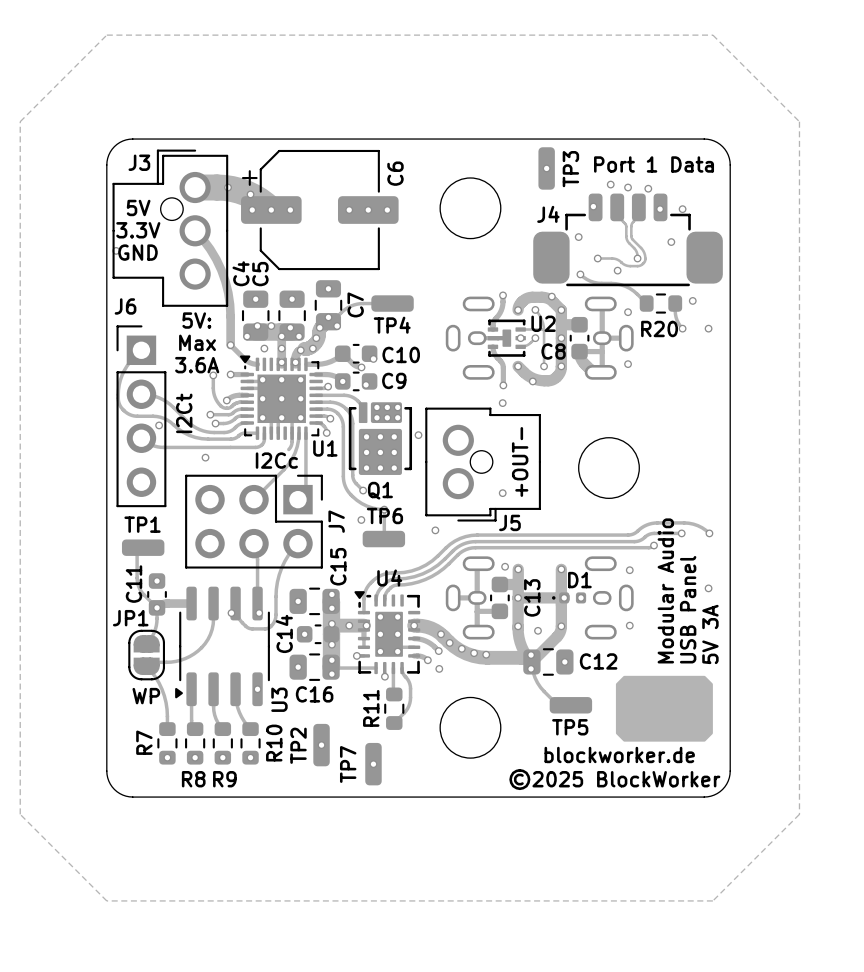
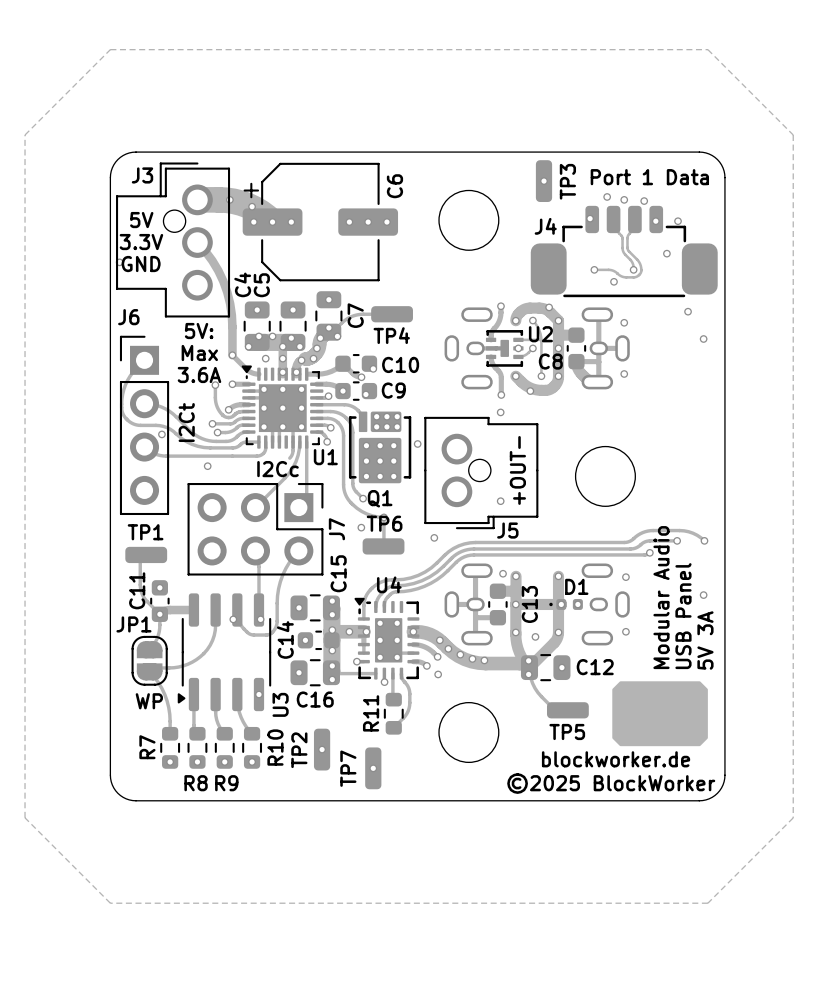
via: (578, 237) -> none
track: (580, 274) (594, 282) (625, 286) (633, 291) (646, 303) -> none
via: (580, 274) -> none
R20: (660, 303) -> none
track: (675, 303) (676, 317) (682, 328) -> none
via: (682, 328) -> none

